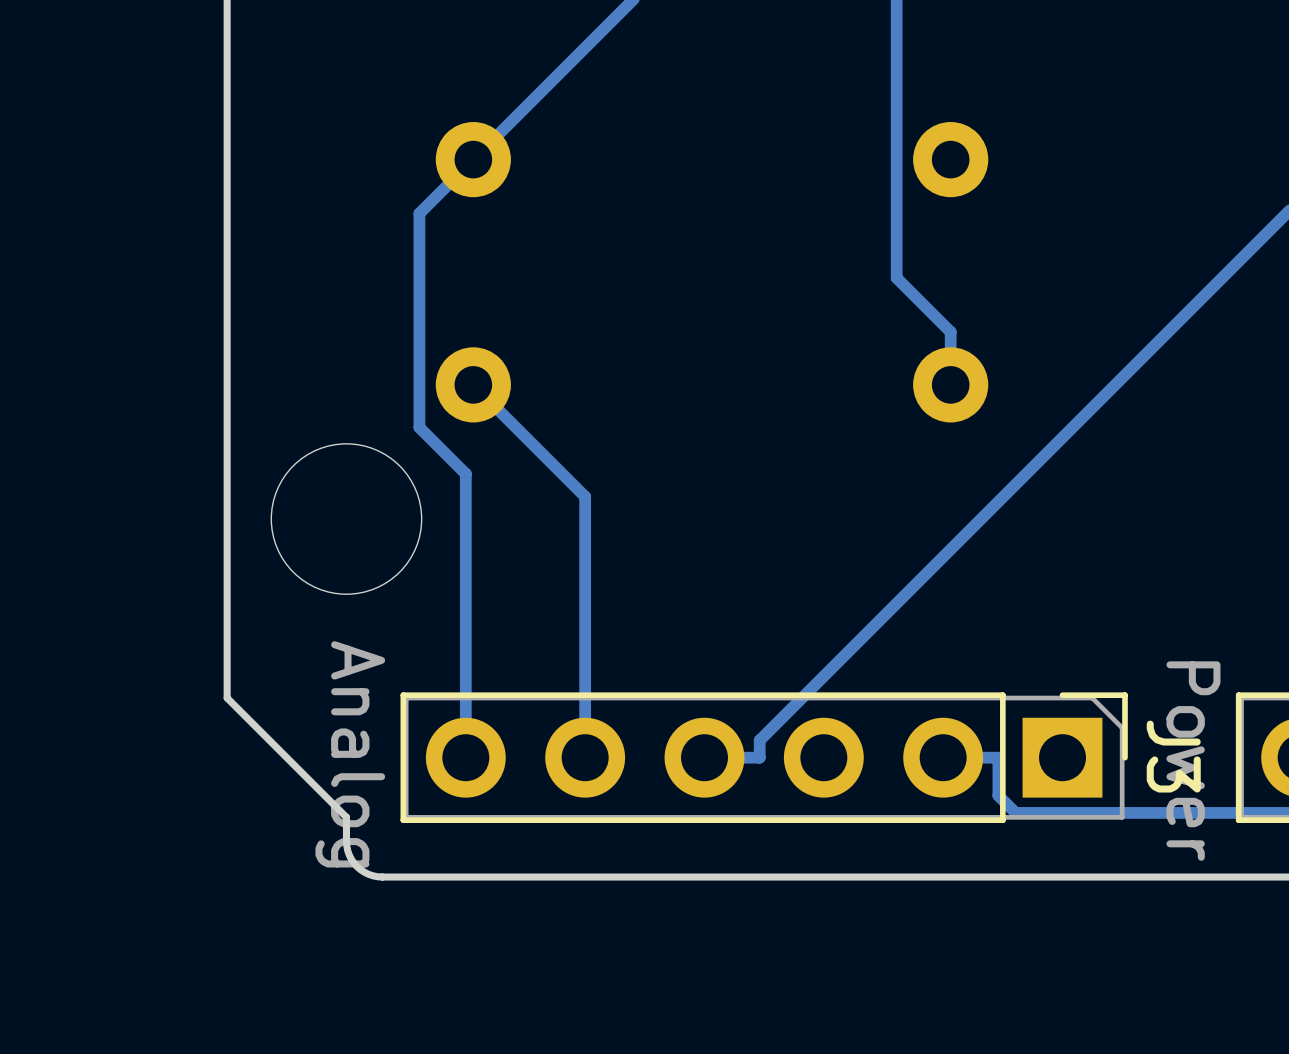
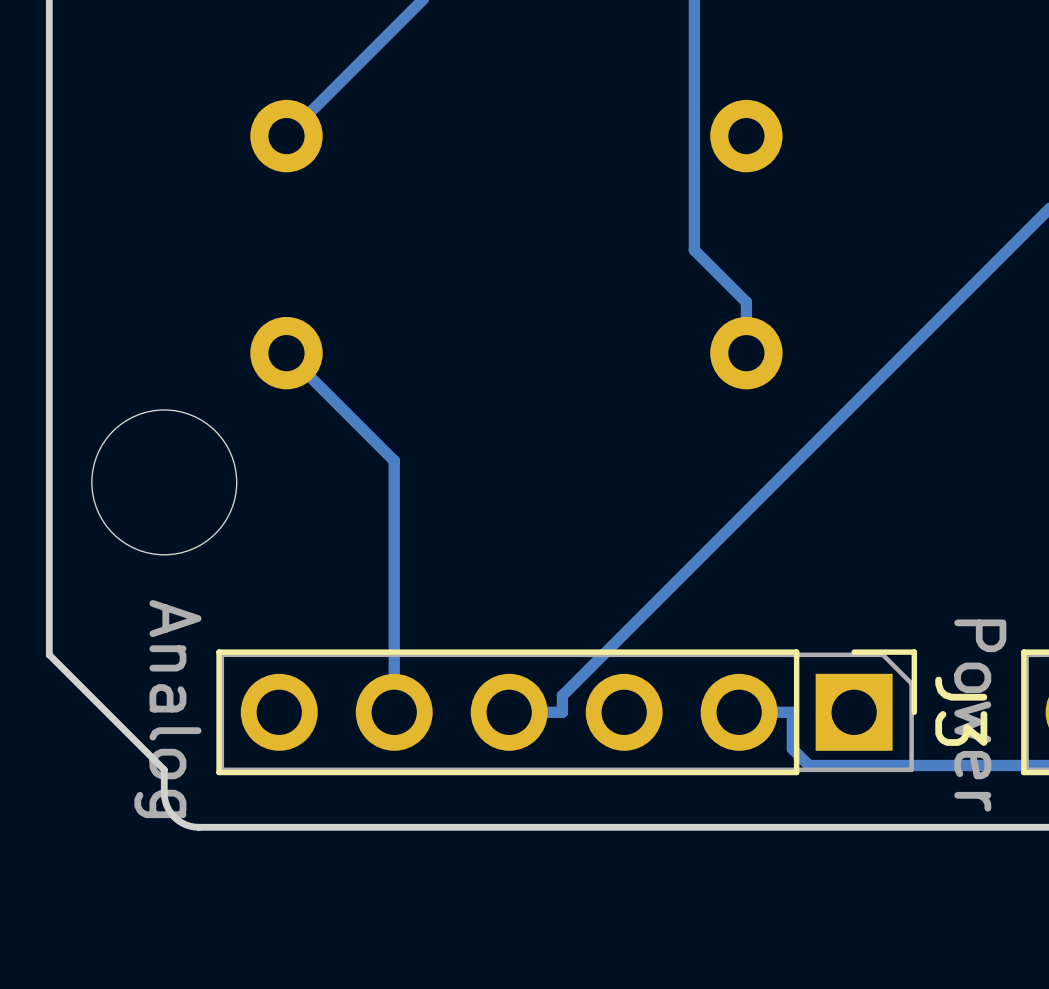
track: (473, 159) (419, 213) (419, 427) (465, 473) (465, 757) -> none

